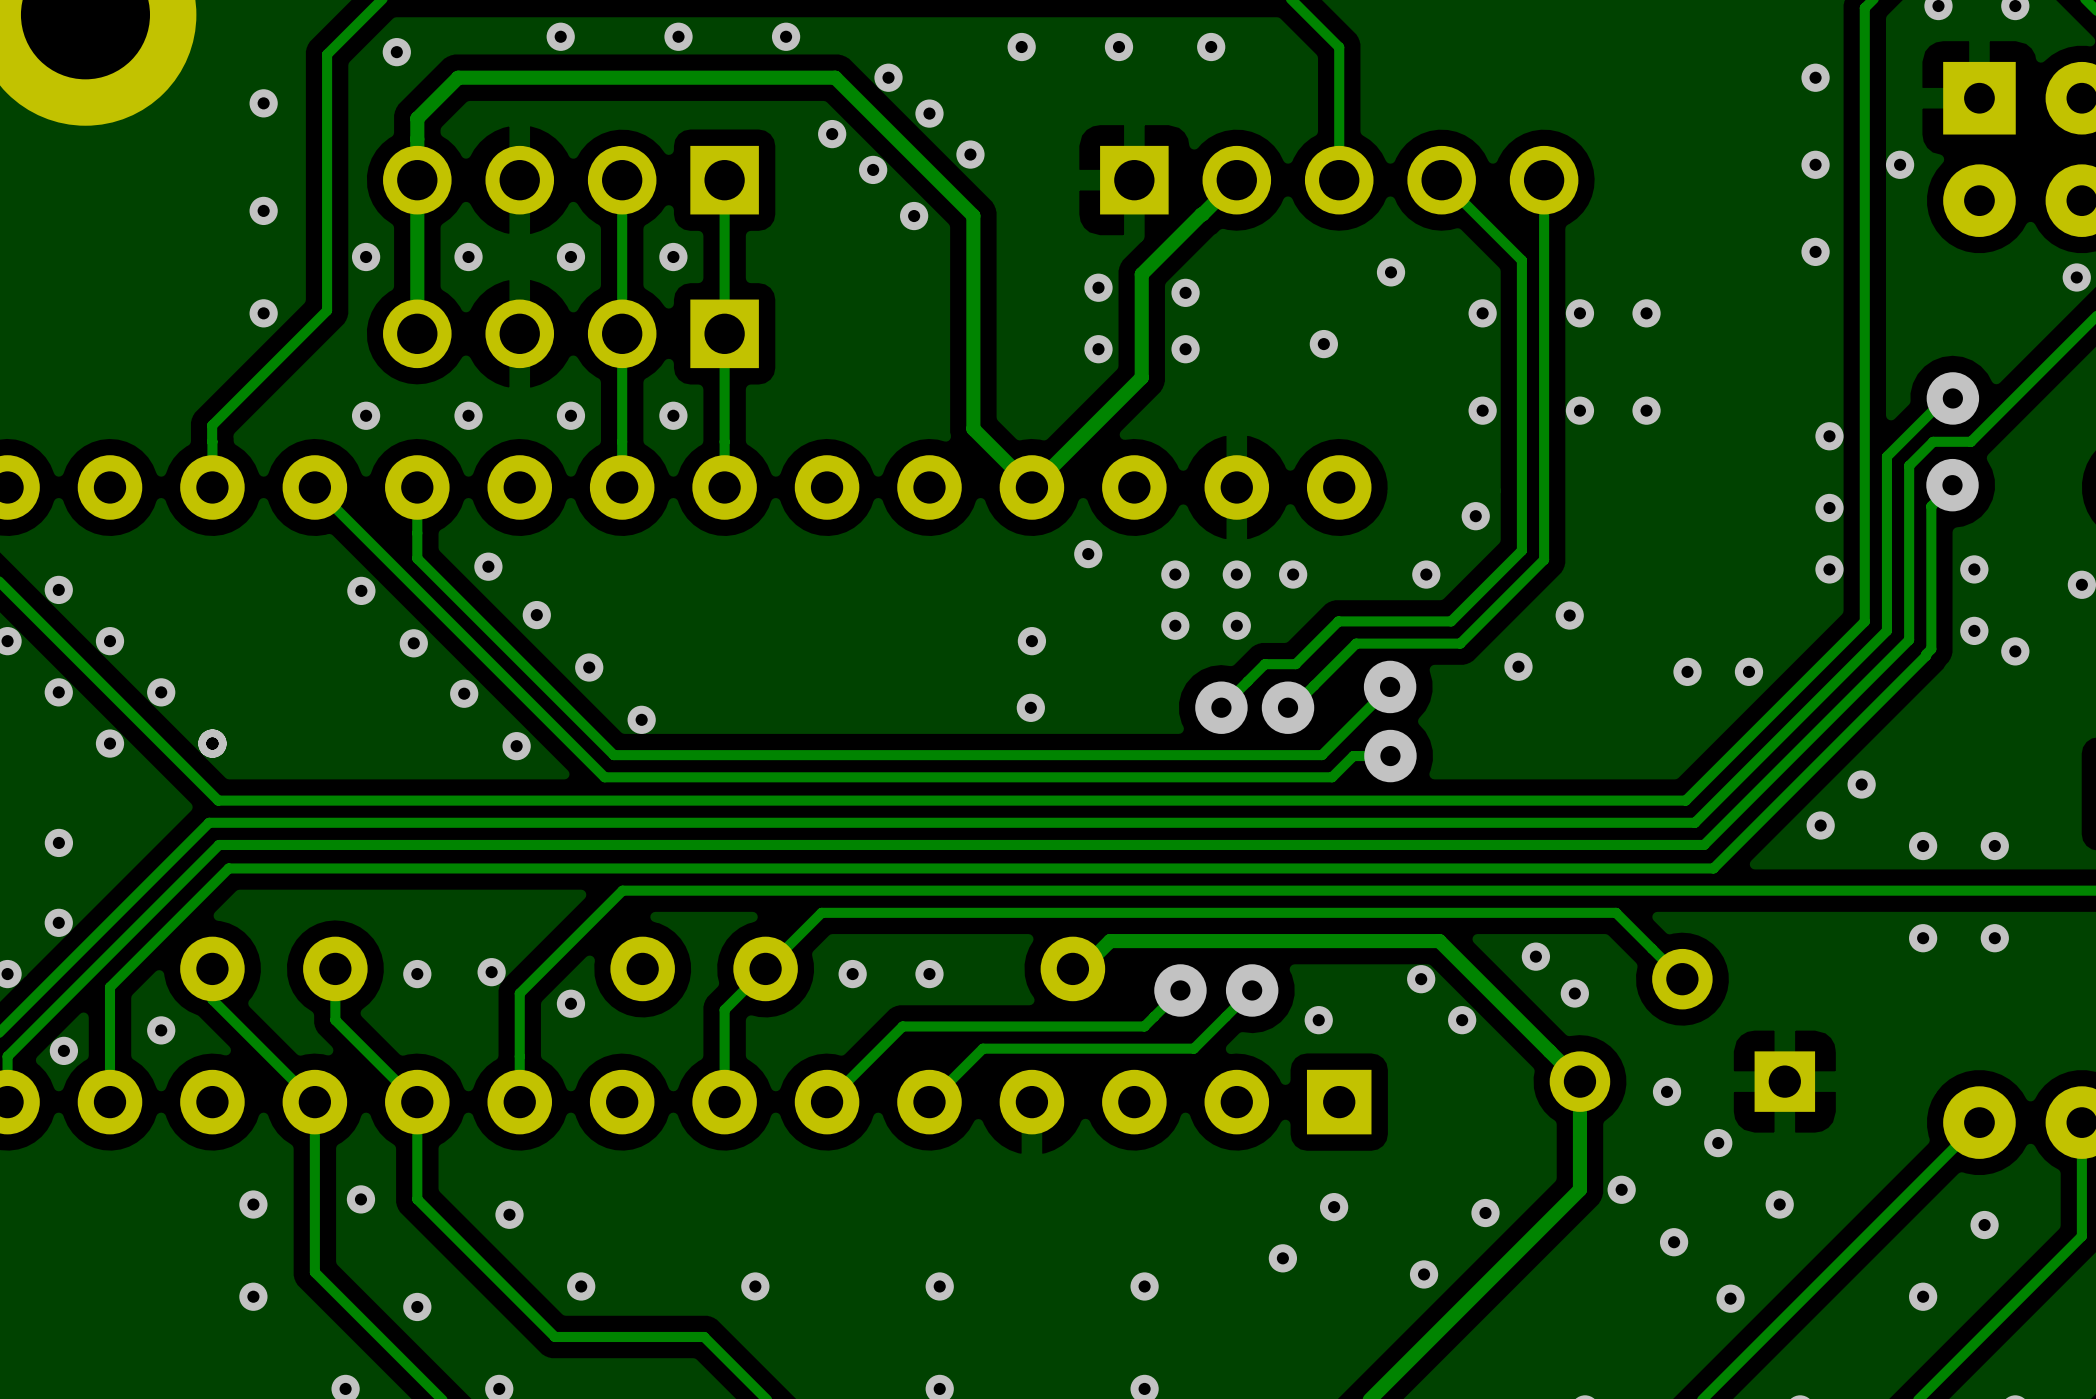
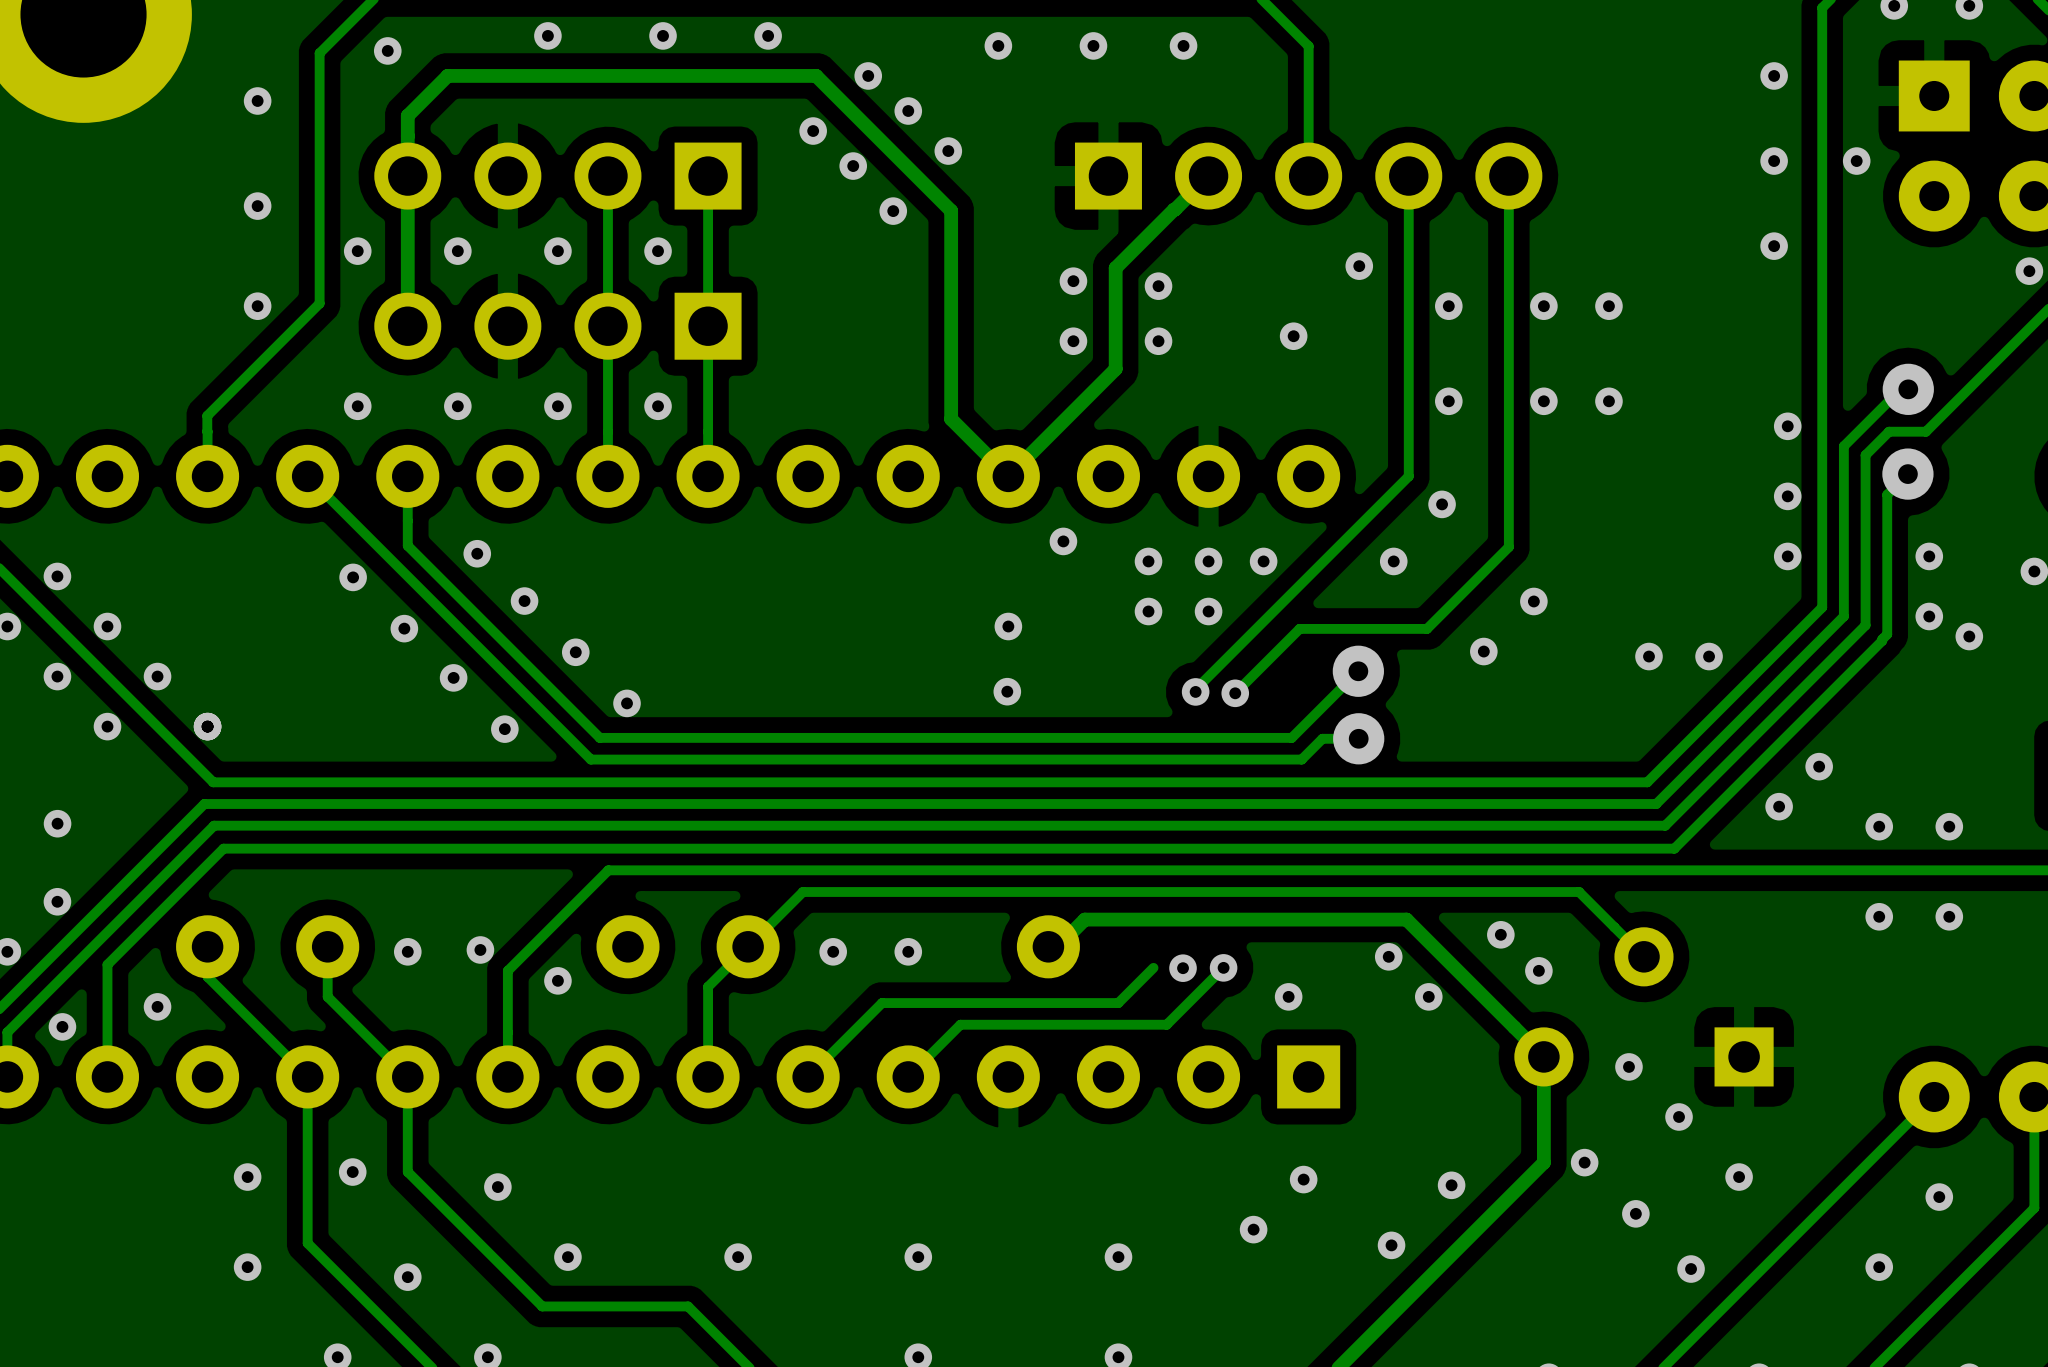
track: (1441, 180) (1521, 260) (1521, 550) (1451, 621) (1338, 621) (1295, 664) (1264, 664) -> (1408, 176) (1408, 476) (1236, 649)
track: (1356, 643) (1288, 711) -> (1325, 628) (1299, 628) (1235, 693)
via size: [1195, 681, 1248, 734] -> [1181, 678, 1210, 706]
via size: [1261, 681, 1315, 734] -> [1221, 679, 1250, 708]
via size: [1154, 964, 1207, 1017] -> [1169, 954, 1197, 982]
via size: [1225, 964, 1279, 1017] -> [1209, 954, 1238, 982]

